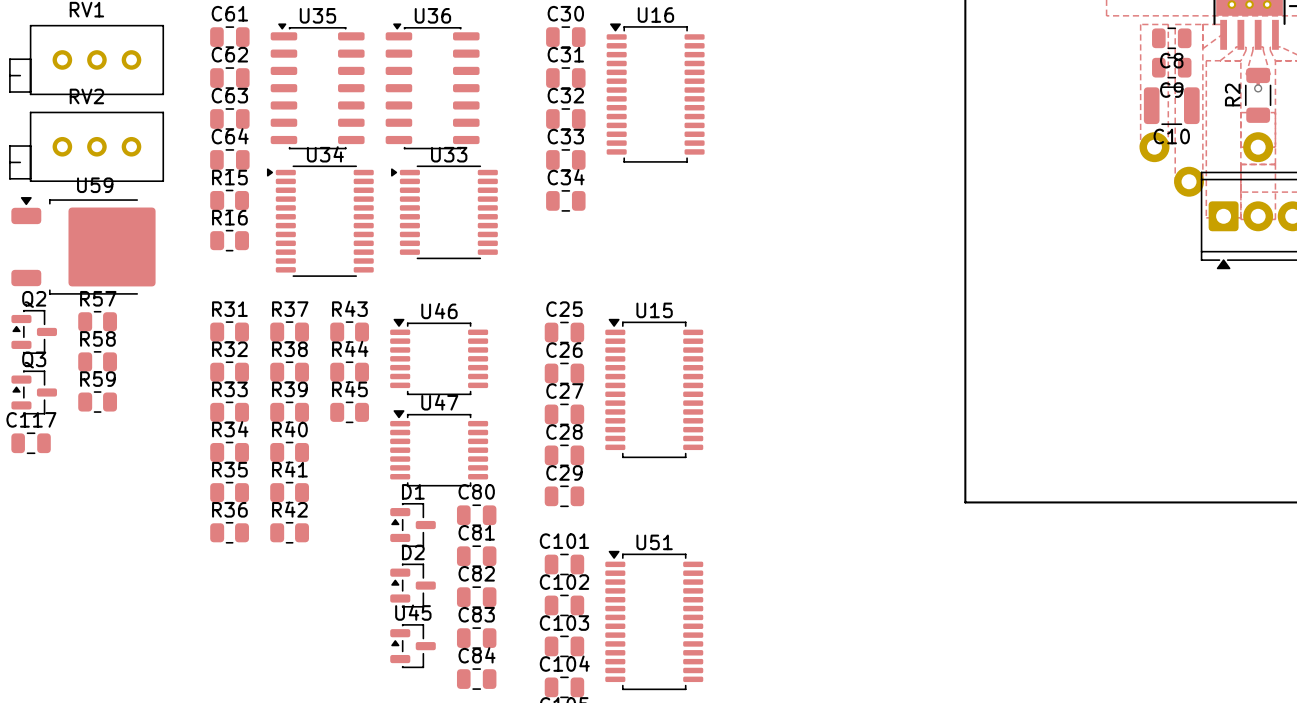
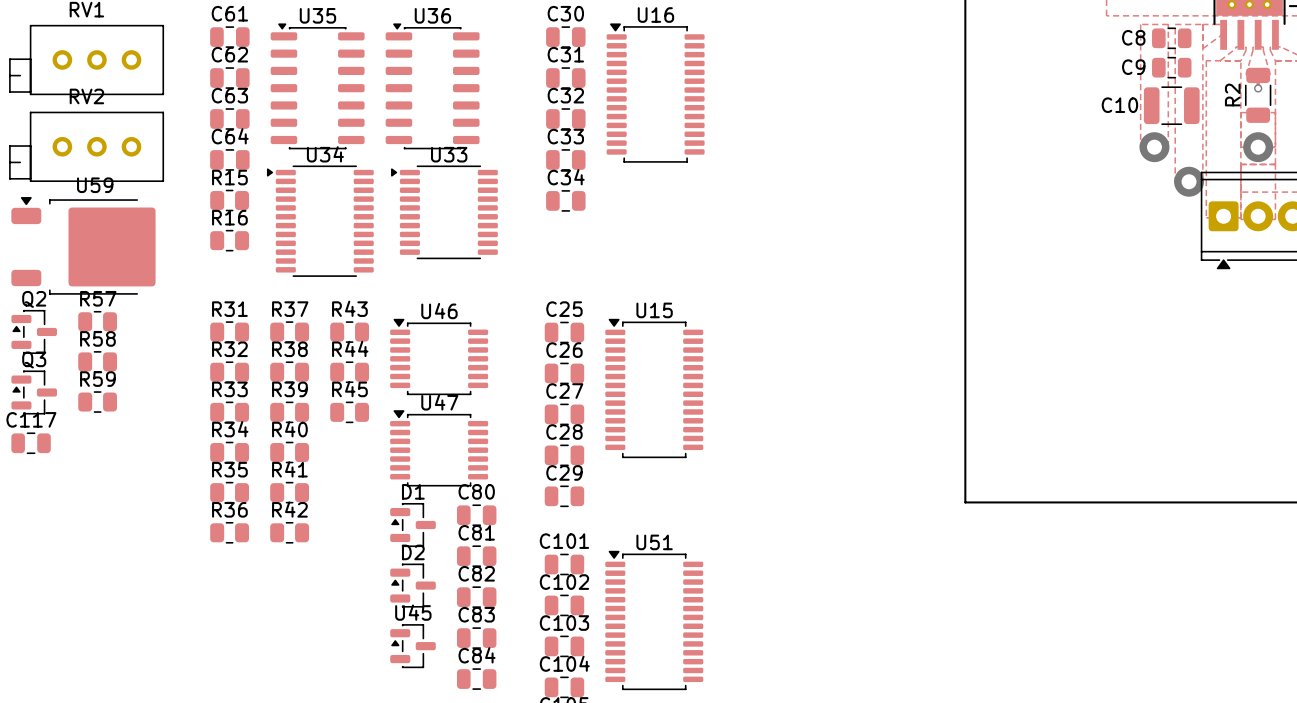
C8 name position: C8 (1171, 60) -> C8 (1133, 37)
C9 name position: C9 (1171, 90) -> C9 (1133, 67)
C10 name position: C10 (1171, 136) -> C10 (1119, 105)
part: (1154, 147) -> none
via: none -> (1154, 147)
part: (1258, 147) -> none
via: none -> (1258, 147)
part: (1189, 181) -> none
via: none -> (1189, 181)

